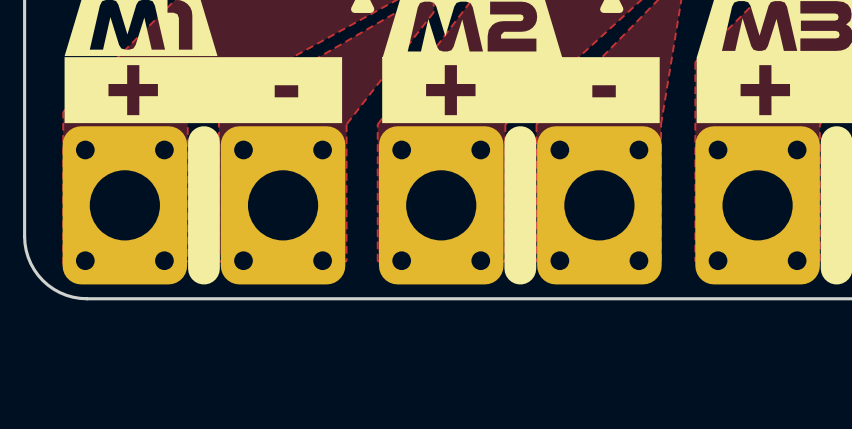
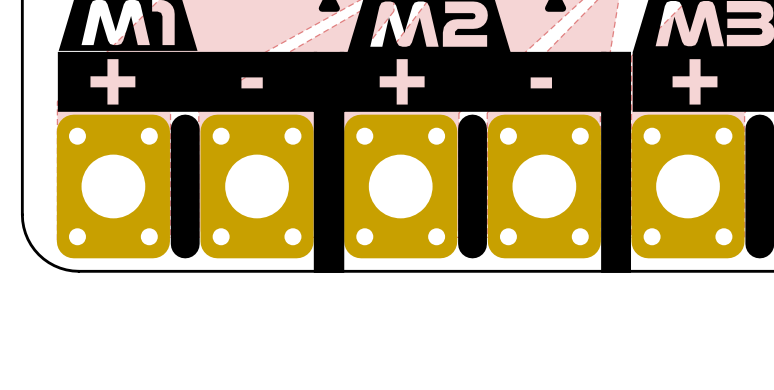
drawing shape: [64, 57, 343, 124] -> [57, 51, 318, 112]
drawing: none -> [313, 51, 345, 273]
drawing shape: [382, 57, 660, 124] -> [339, 51, 607, 112]
drawing: none -> [601, 51, 631, 273]

